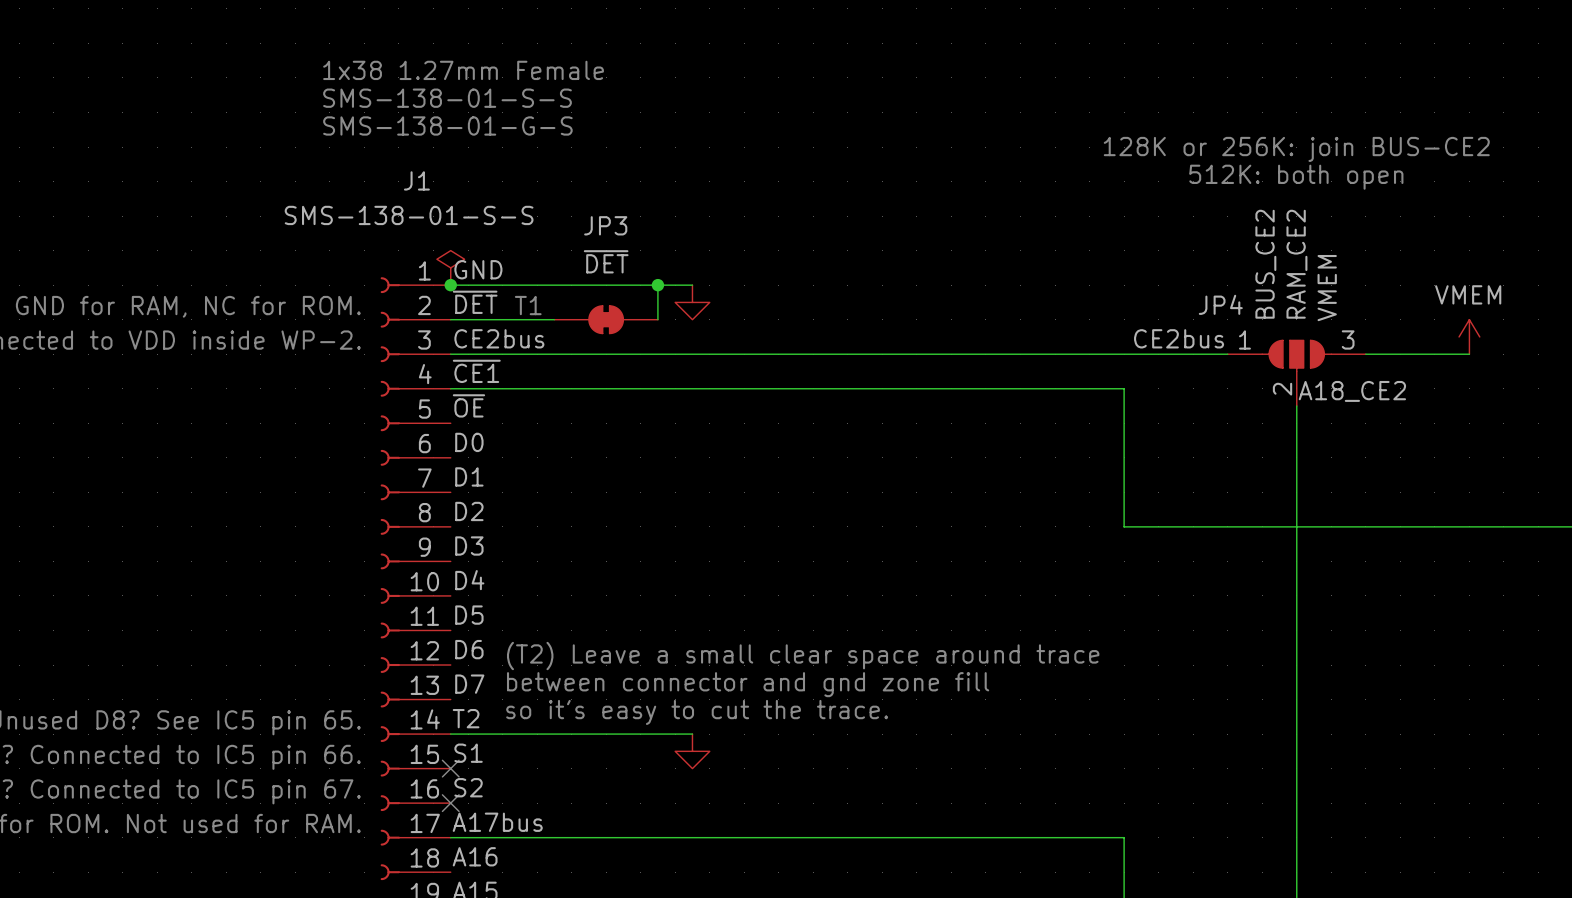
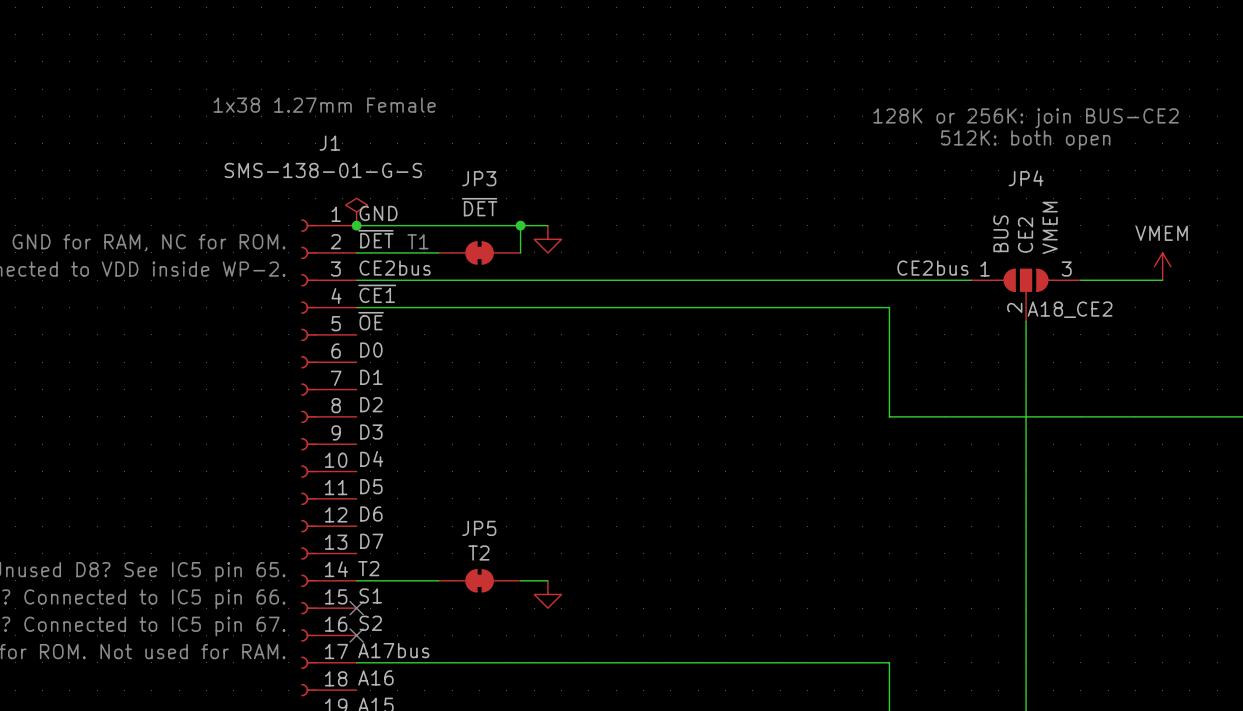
text position: 1x38 1.27mm Female (463, 70) -> 1x38 1.27mm Female (324, 105)
text: SMS-138-01-S-S (447, 98) -> none
text: SMS-138-01-G-S (447, 125) -> none
J1 value: SMS-138-01-S-S (409, 215) -> SMS-138-01-G-S (323, 170)
JP4 text: BUS_CE2 (1265, 264) -> BUS (1000, 233)
JP4 value: RAM_CE2 (1296, 264) -> CE2 (1025, 235)
JP4 name position: JP4 (1220, 304) -> JP4 (1026, 178)
text: (T2) Leave a small clear space around trace (803, 656) -> none
text: between connector and gnd zone fill (748, 684) -> none
text: so it's easy to cut the trace. (697, 712) -> none
JP5: none -> T2 (479, 580)

